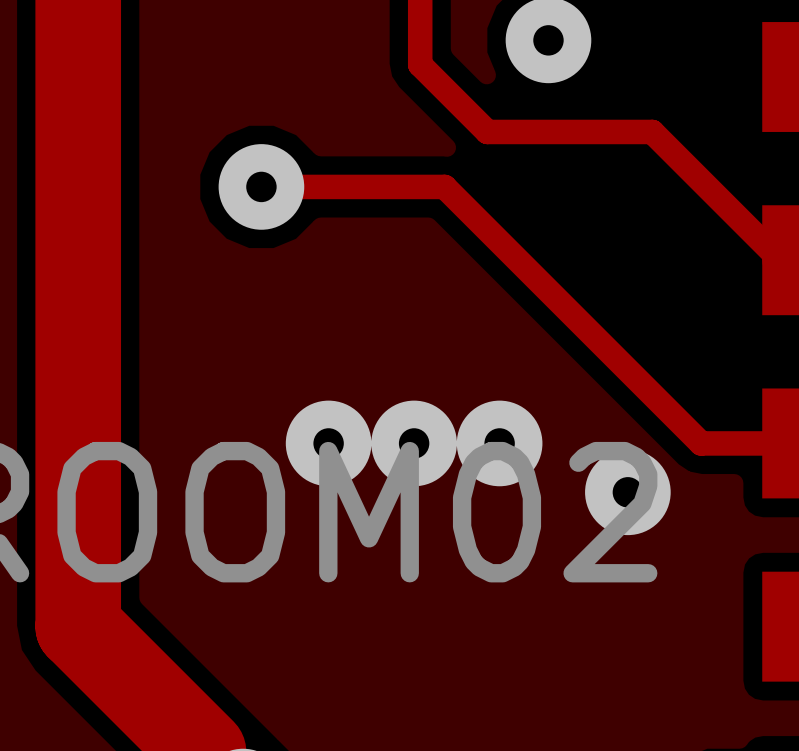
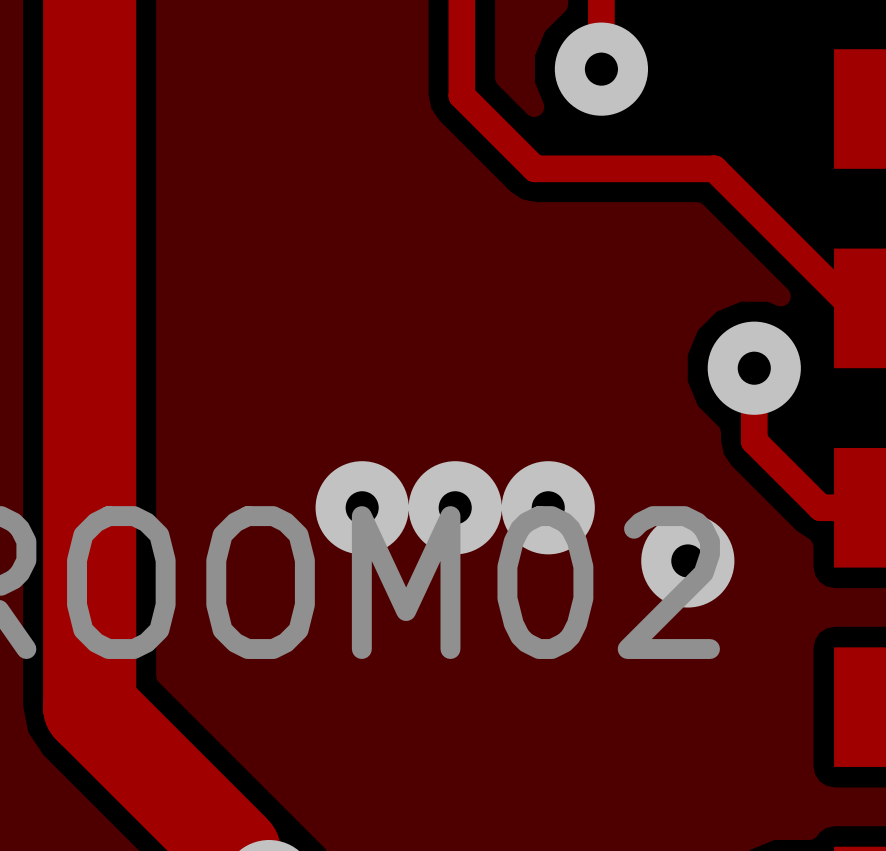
track: (261, 186) (444, 186) (701, 443) (750, 443) -> (754, 368) (754, 441) (820, 507)
via: (261, 186) -> none
via: none -> (754, 368)

